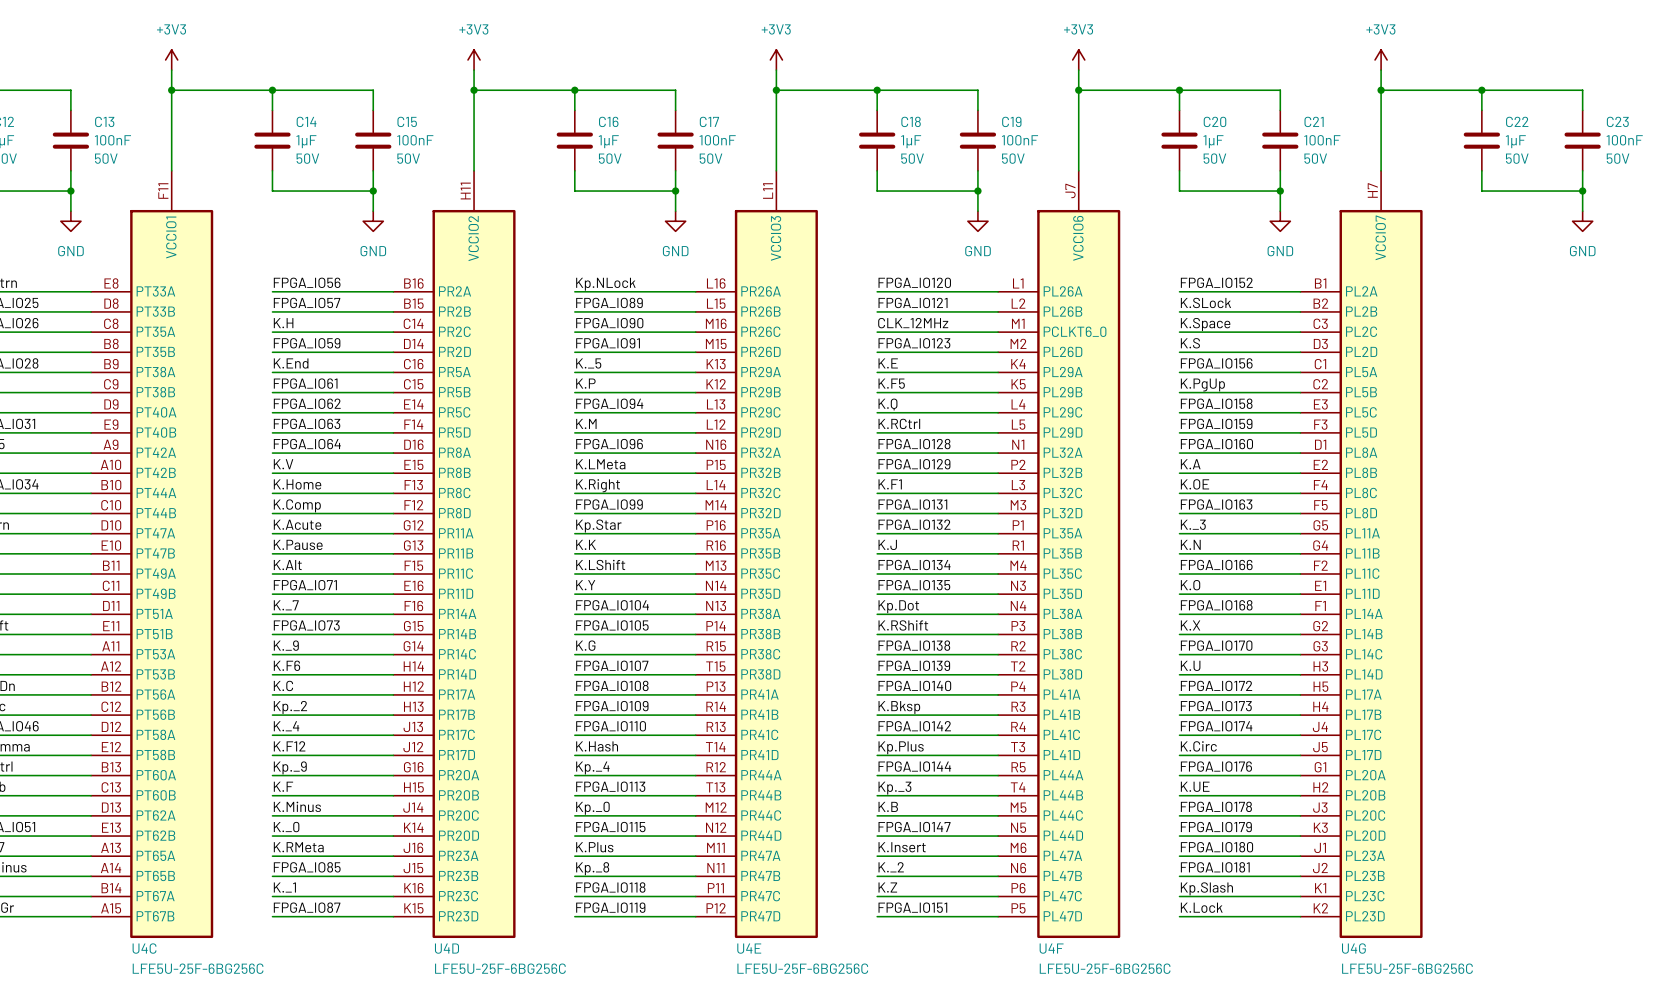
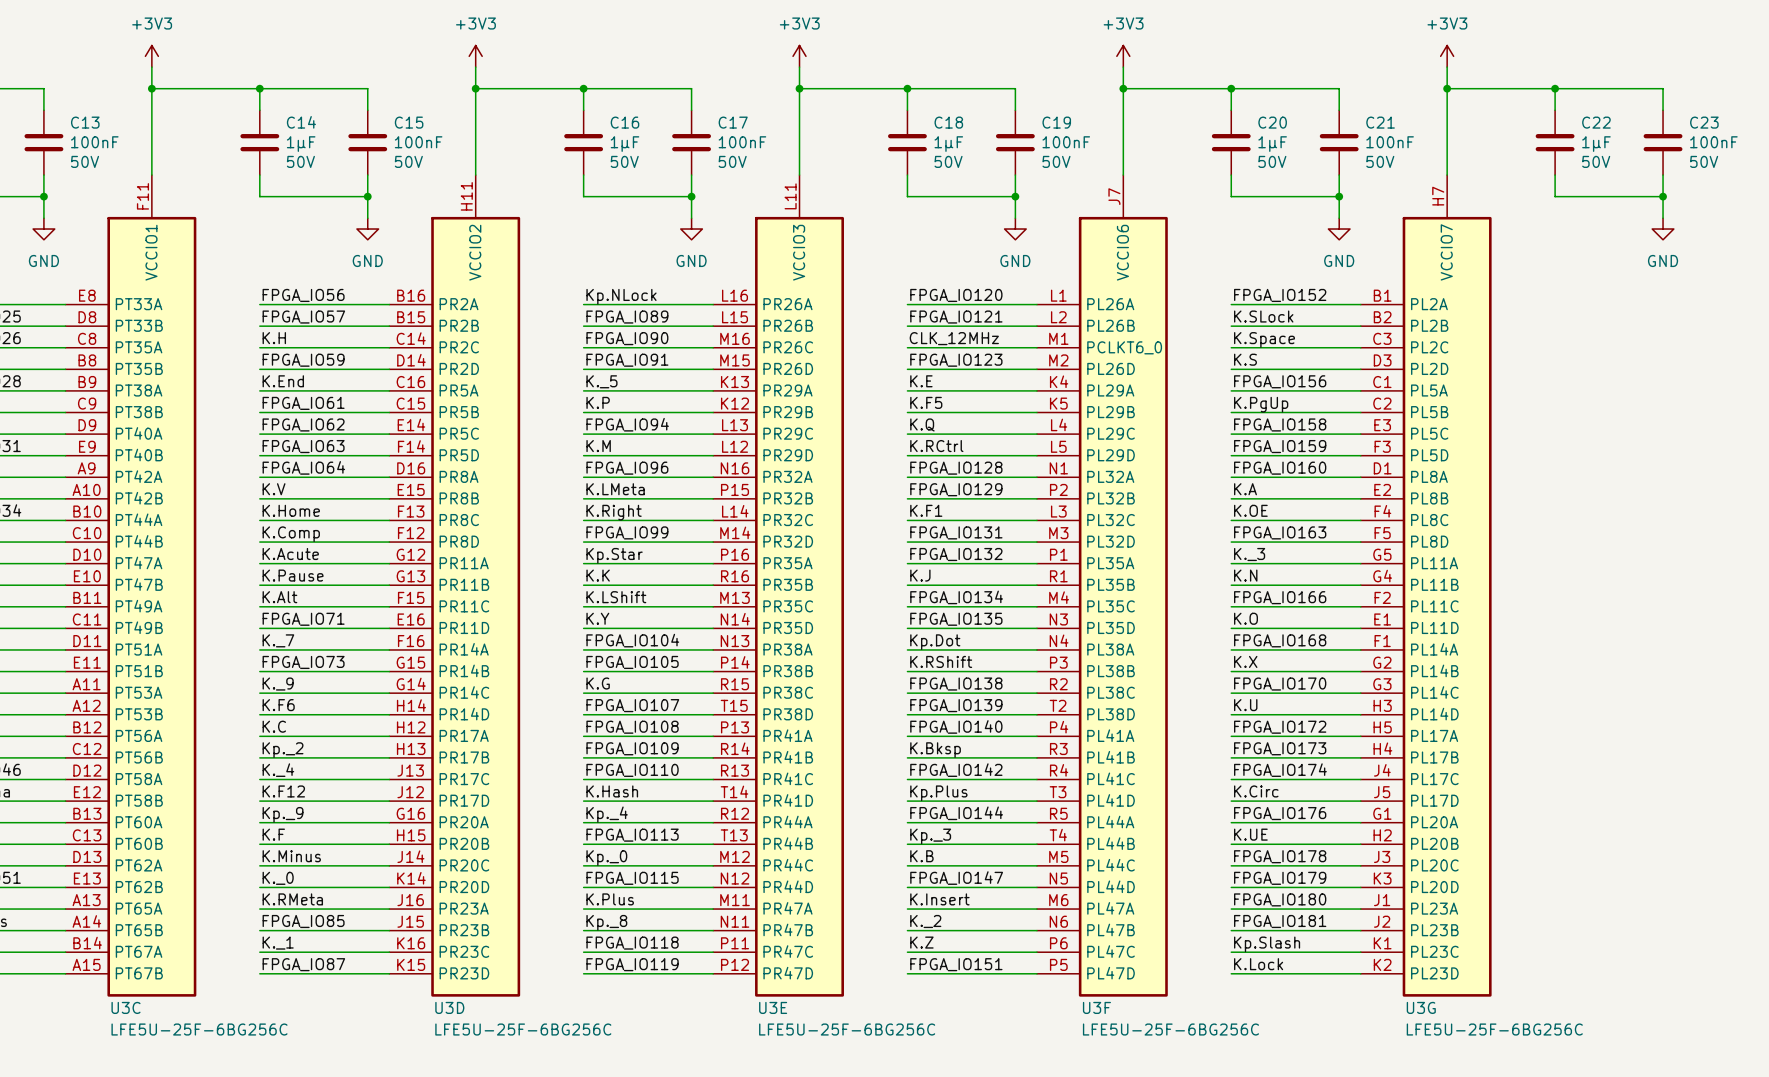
U4C name: U4C (144, 948) -> U3C (126, 1007)
U4D name: U4D (446, 948) -> U3D (449, 1007)
U4E name: U4E (749, 948) -> U3E (773, 1007)
U4F name: U4F (1051, 948) -> U3F (1096, 1007)
U4G name: U4G (1353, 948) -> U3G (1421, 1007)

